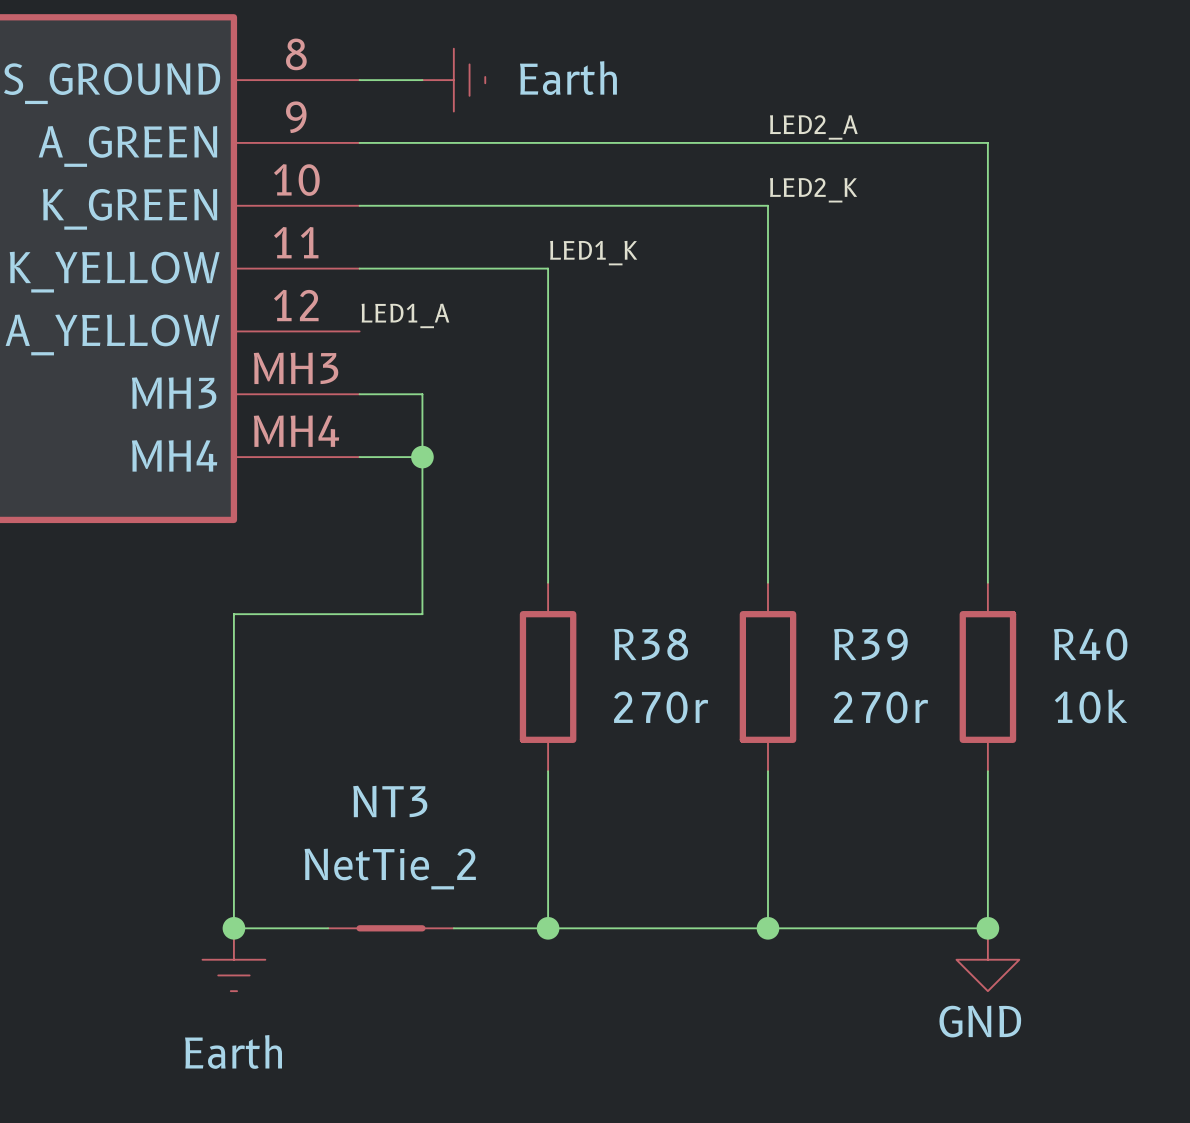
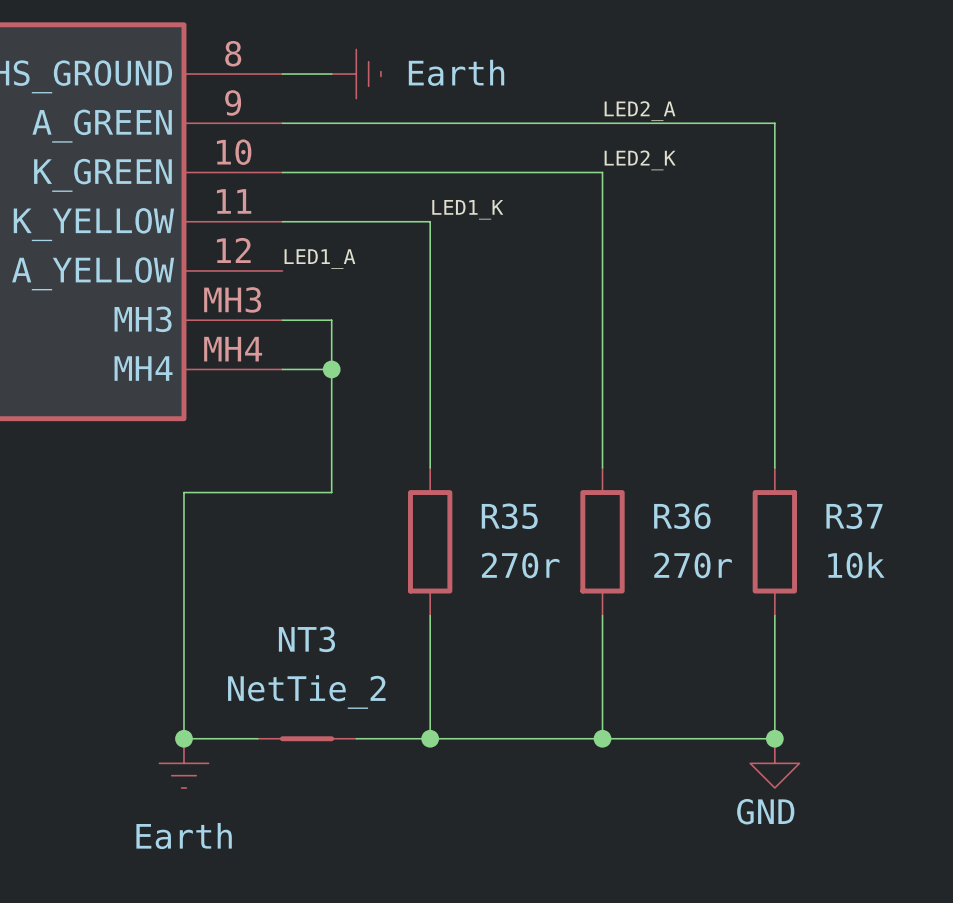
R38 name: R38 (651, 644) -> R35 (509, 516)
R39 name: R39 (870, 644) -> R36 (682, 516)
R40 name: R40 (1090, 644) -> R37 (854, 516)

